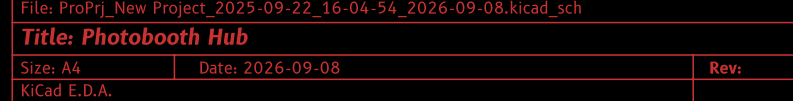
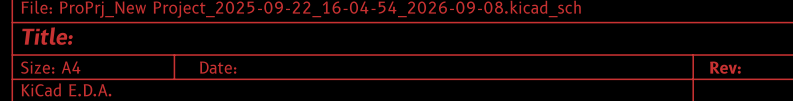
title block: Title: Photobooth Hub (134, 36) -> Title: (47, 36)
title block: Date: 2026-09-08 (269, 67) -> Date: (218, 67)

